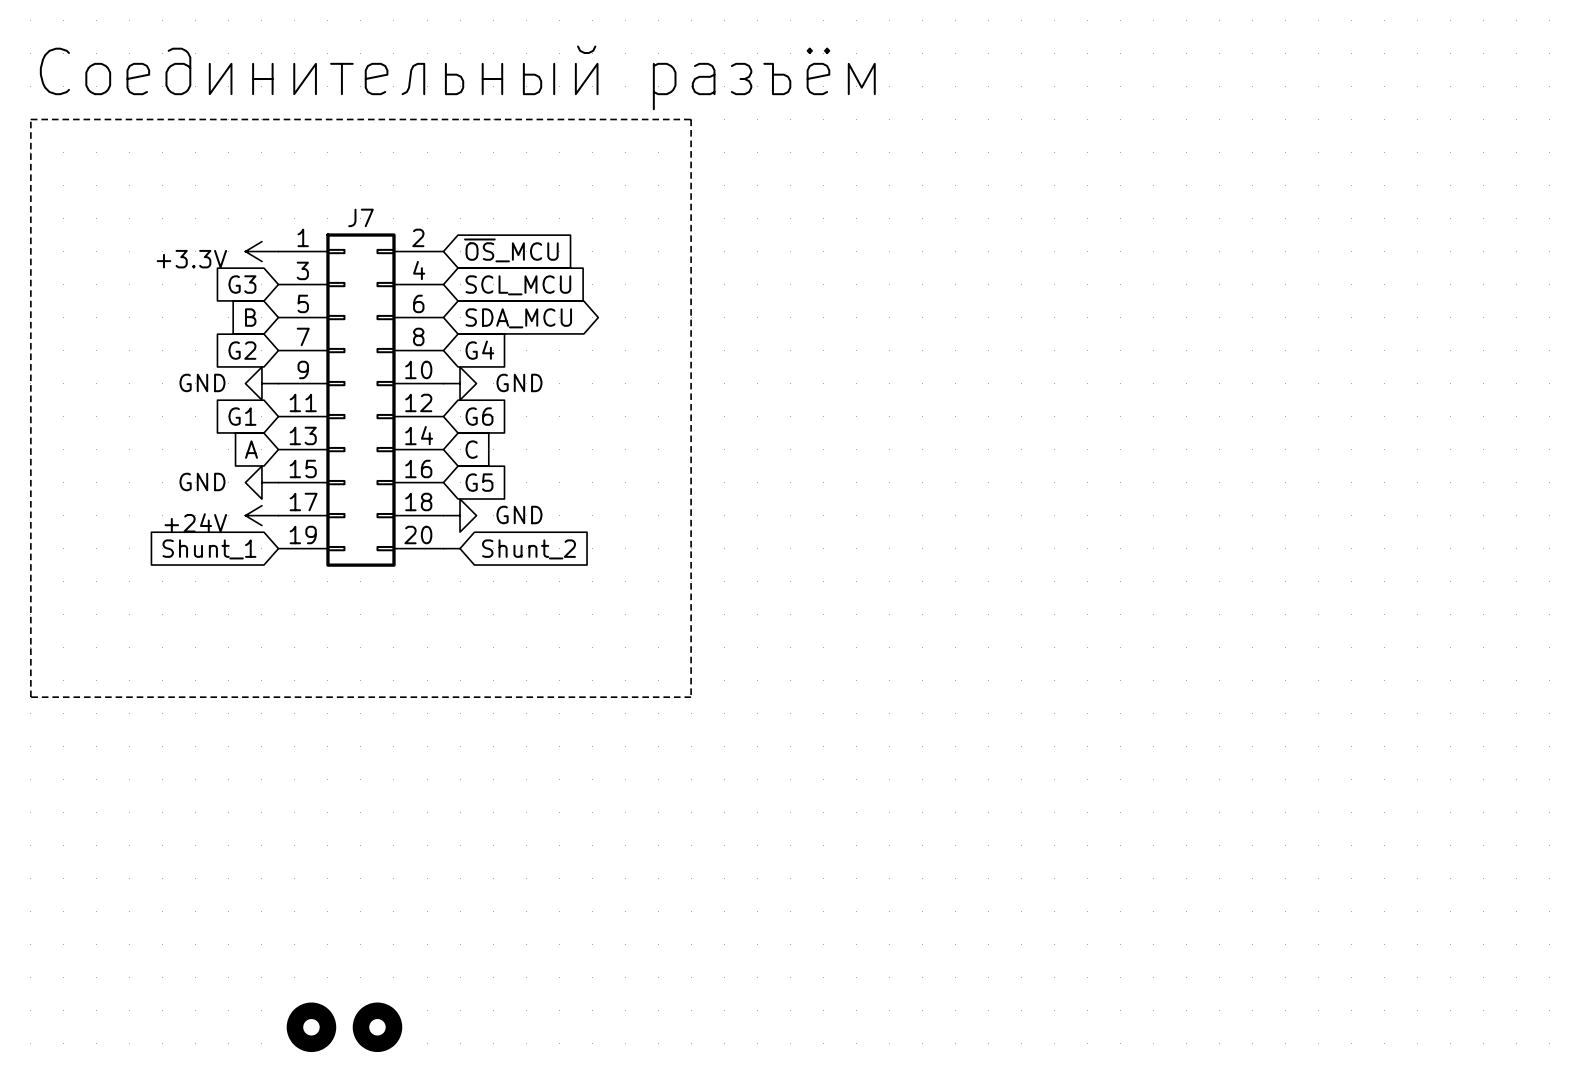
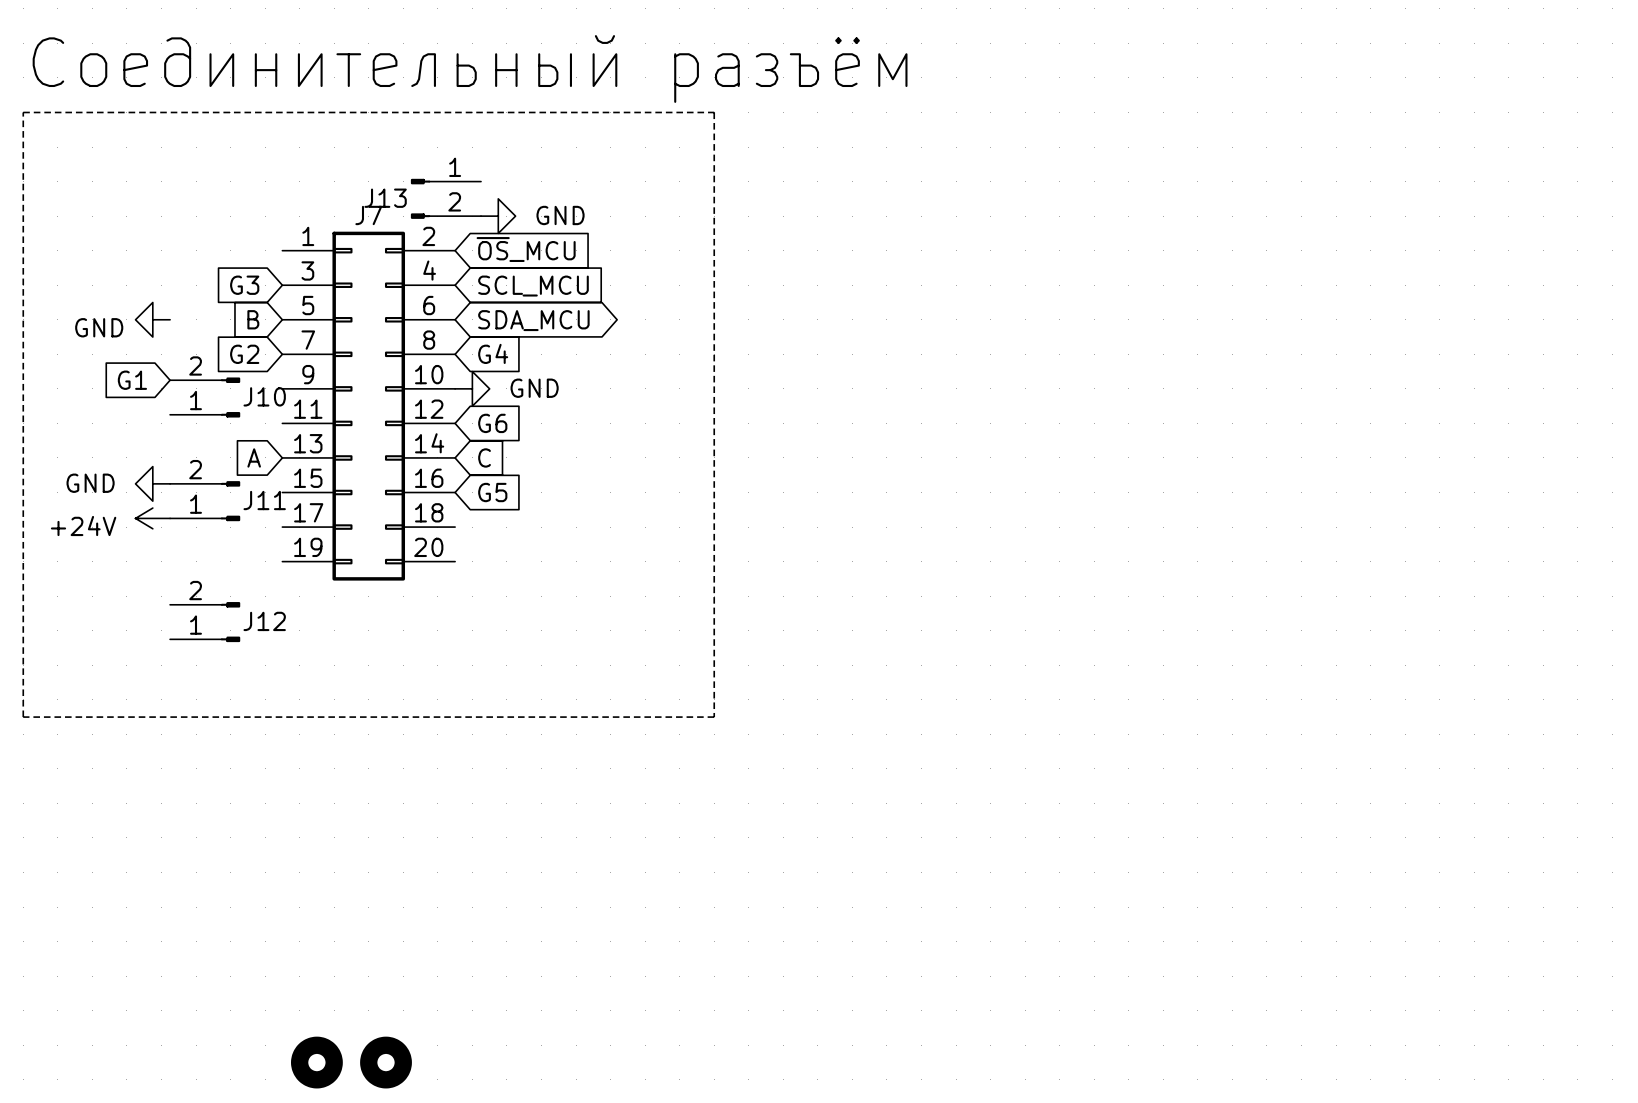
J13: none -> (445, 198)
power symbol: none -> GND (498, 216)
power symbol: +3.3V (261, 251) -> none
power symbol: none -> GND (152, 319)
power symbol: GND (261, 383) -> none
J10: none -> (205, 397)
global label position: G1 (242, 416) -> G1 (132, 380)
power symbol: none -> GND (152, 483)
power symbol: GND (261, 482) -> none
J11: none -> (205, 501)
power symbol position: +24V (261, 515) -> +24V (152, 518)
power symbol: GND (460, 515) -> none
wire: (443, 548) (460, 548) -> none
global label: Shunt_1 (209, 549) -> none
global label: Shunt_2 (529, 549) -> none
J12: none -> (205, 622)

